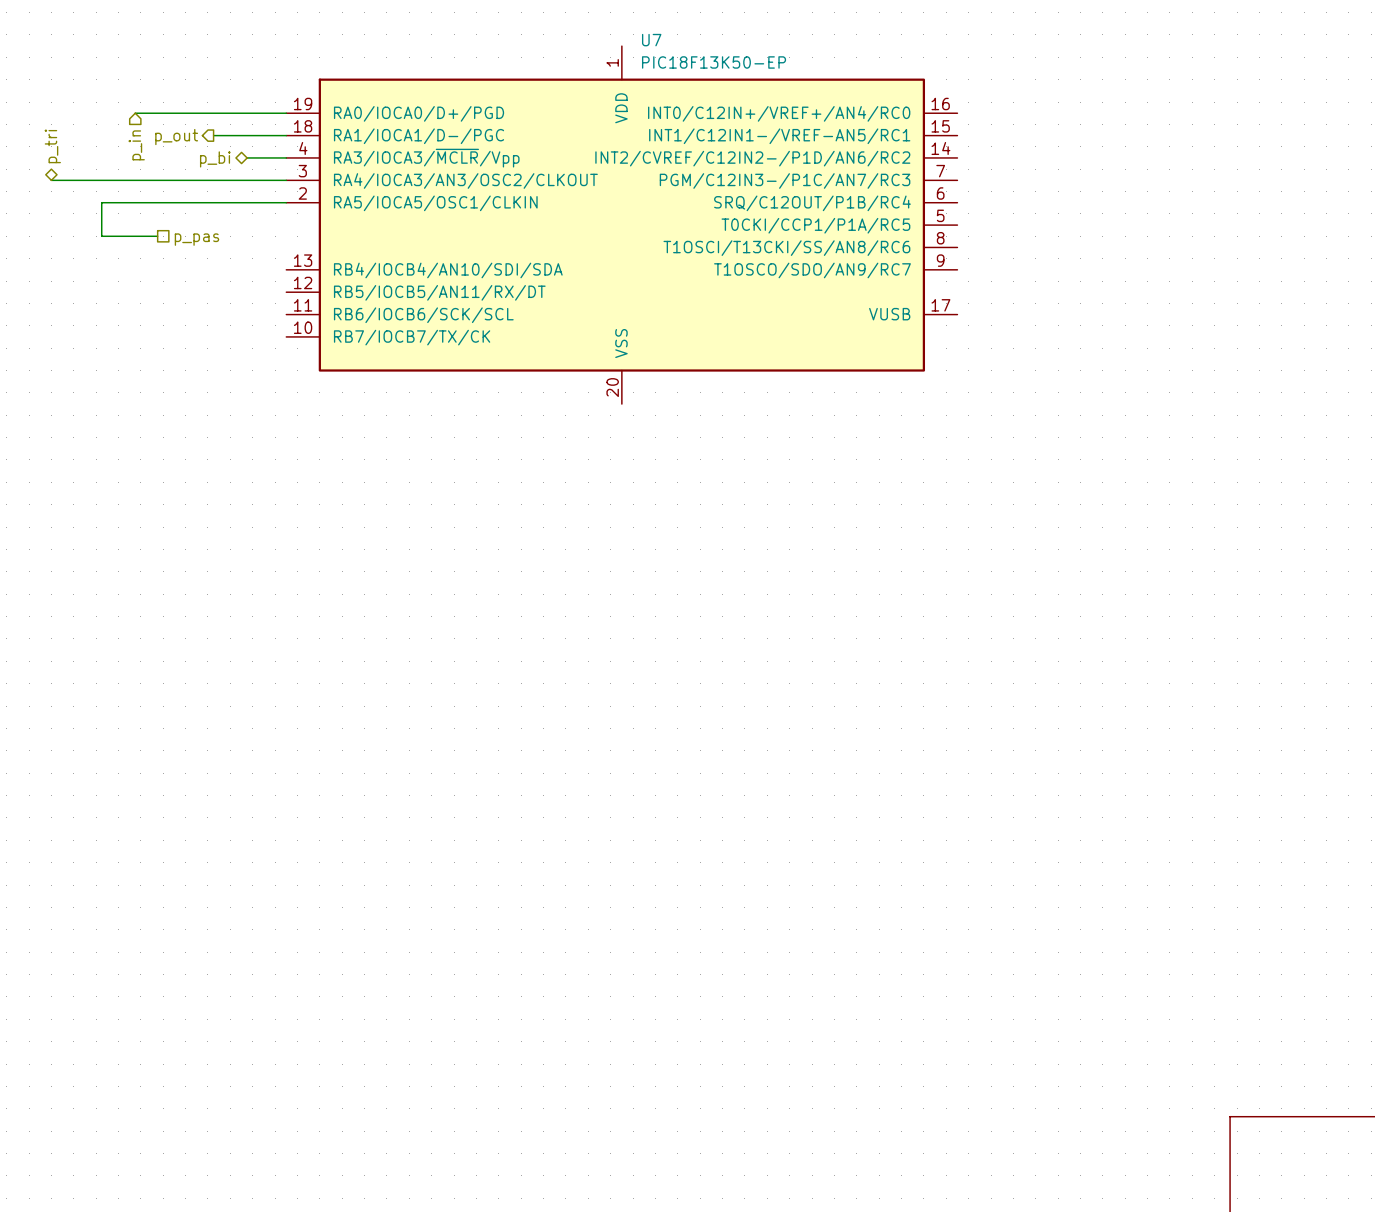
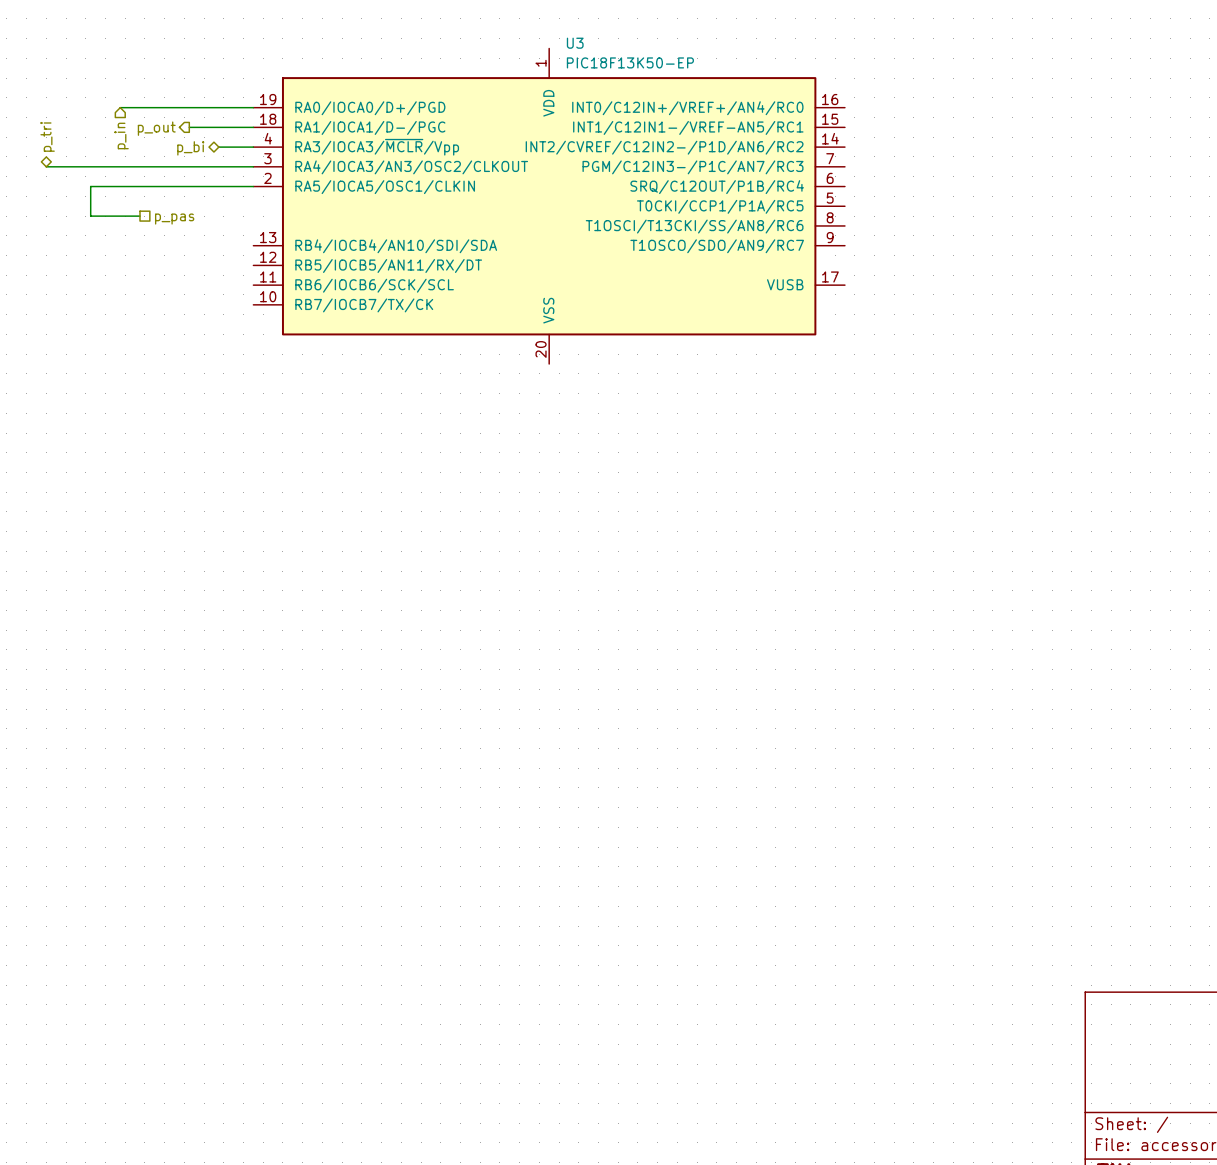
U7 name: U7 (651, 40) -> U3 (575, 43)

